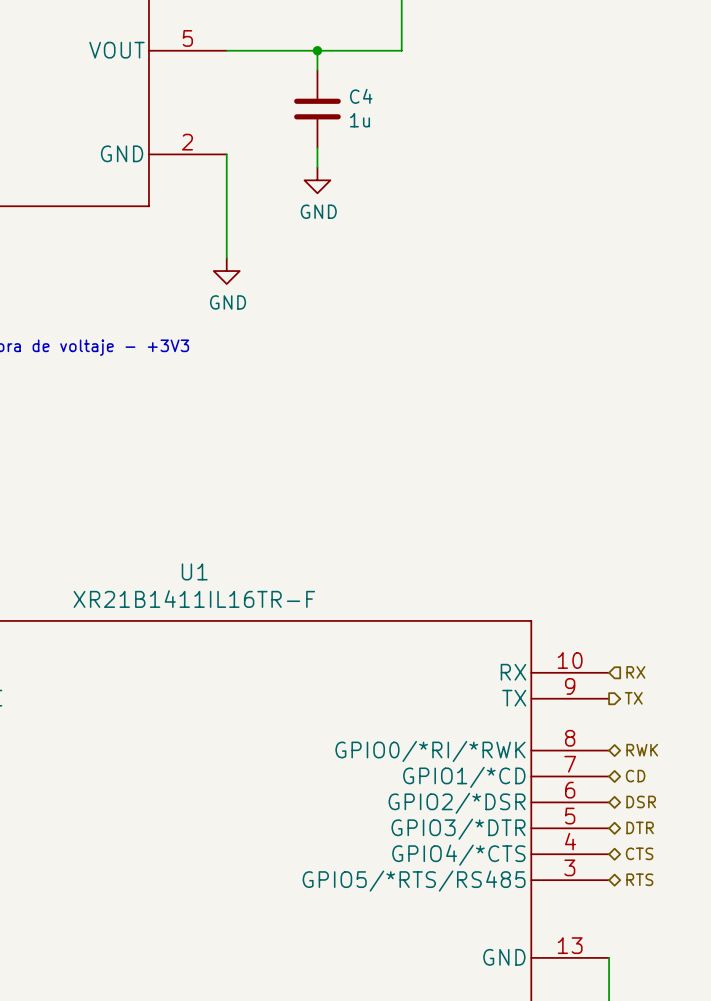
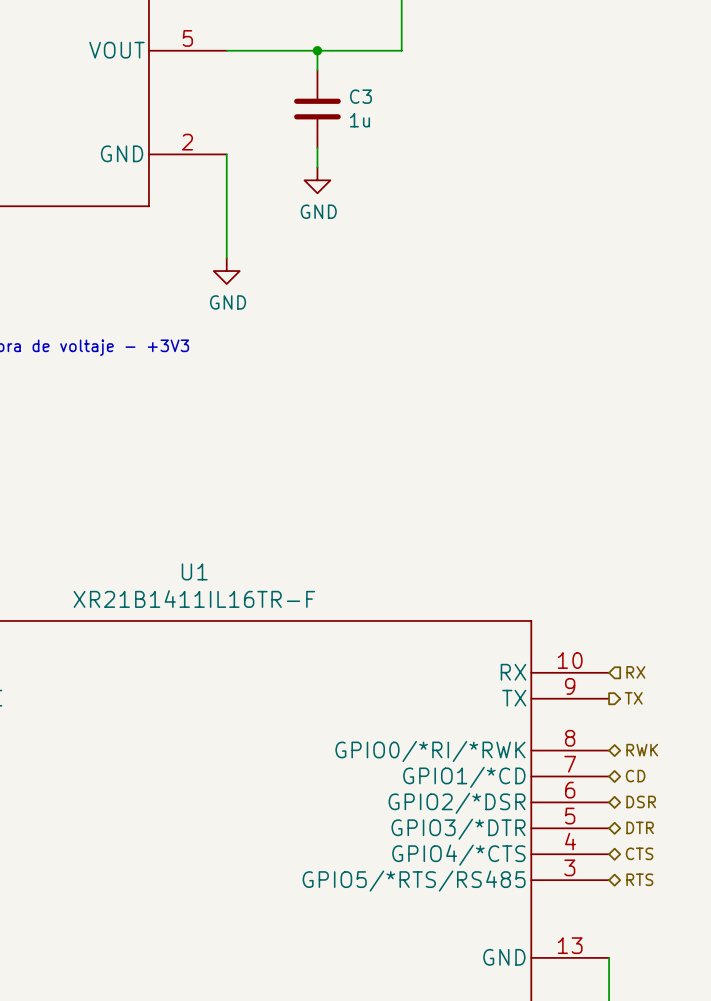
C4 name: C4 (361, 96) -> C3 (360, 96)

